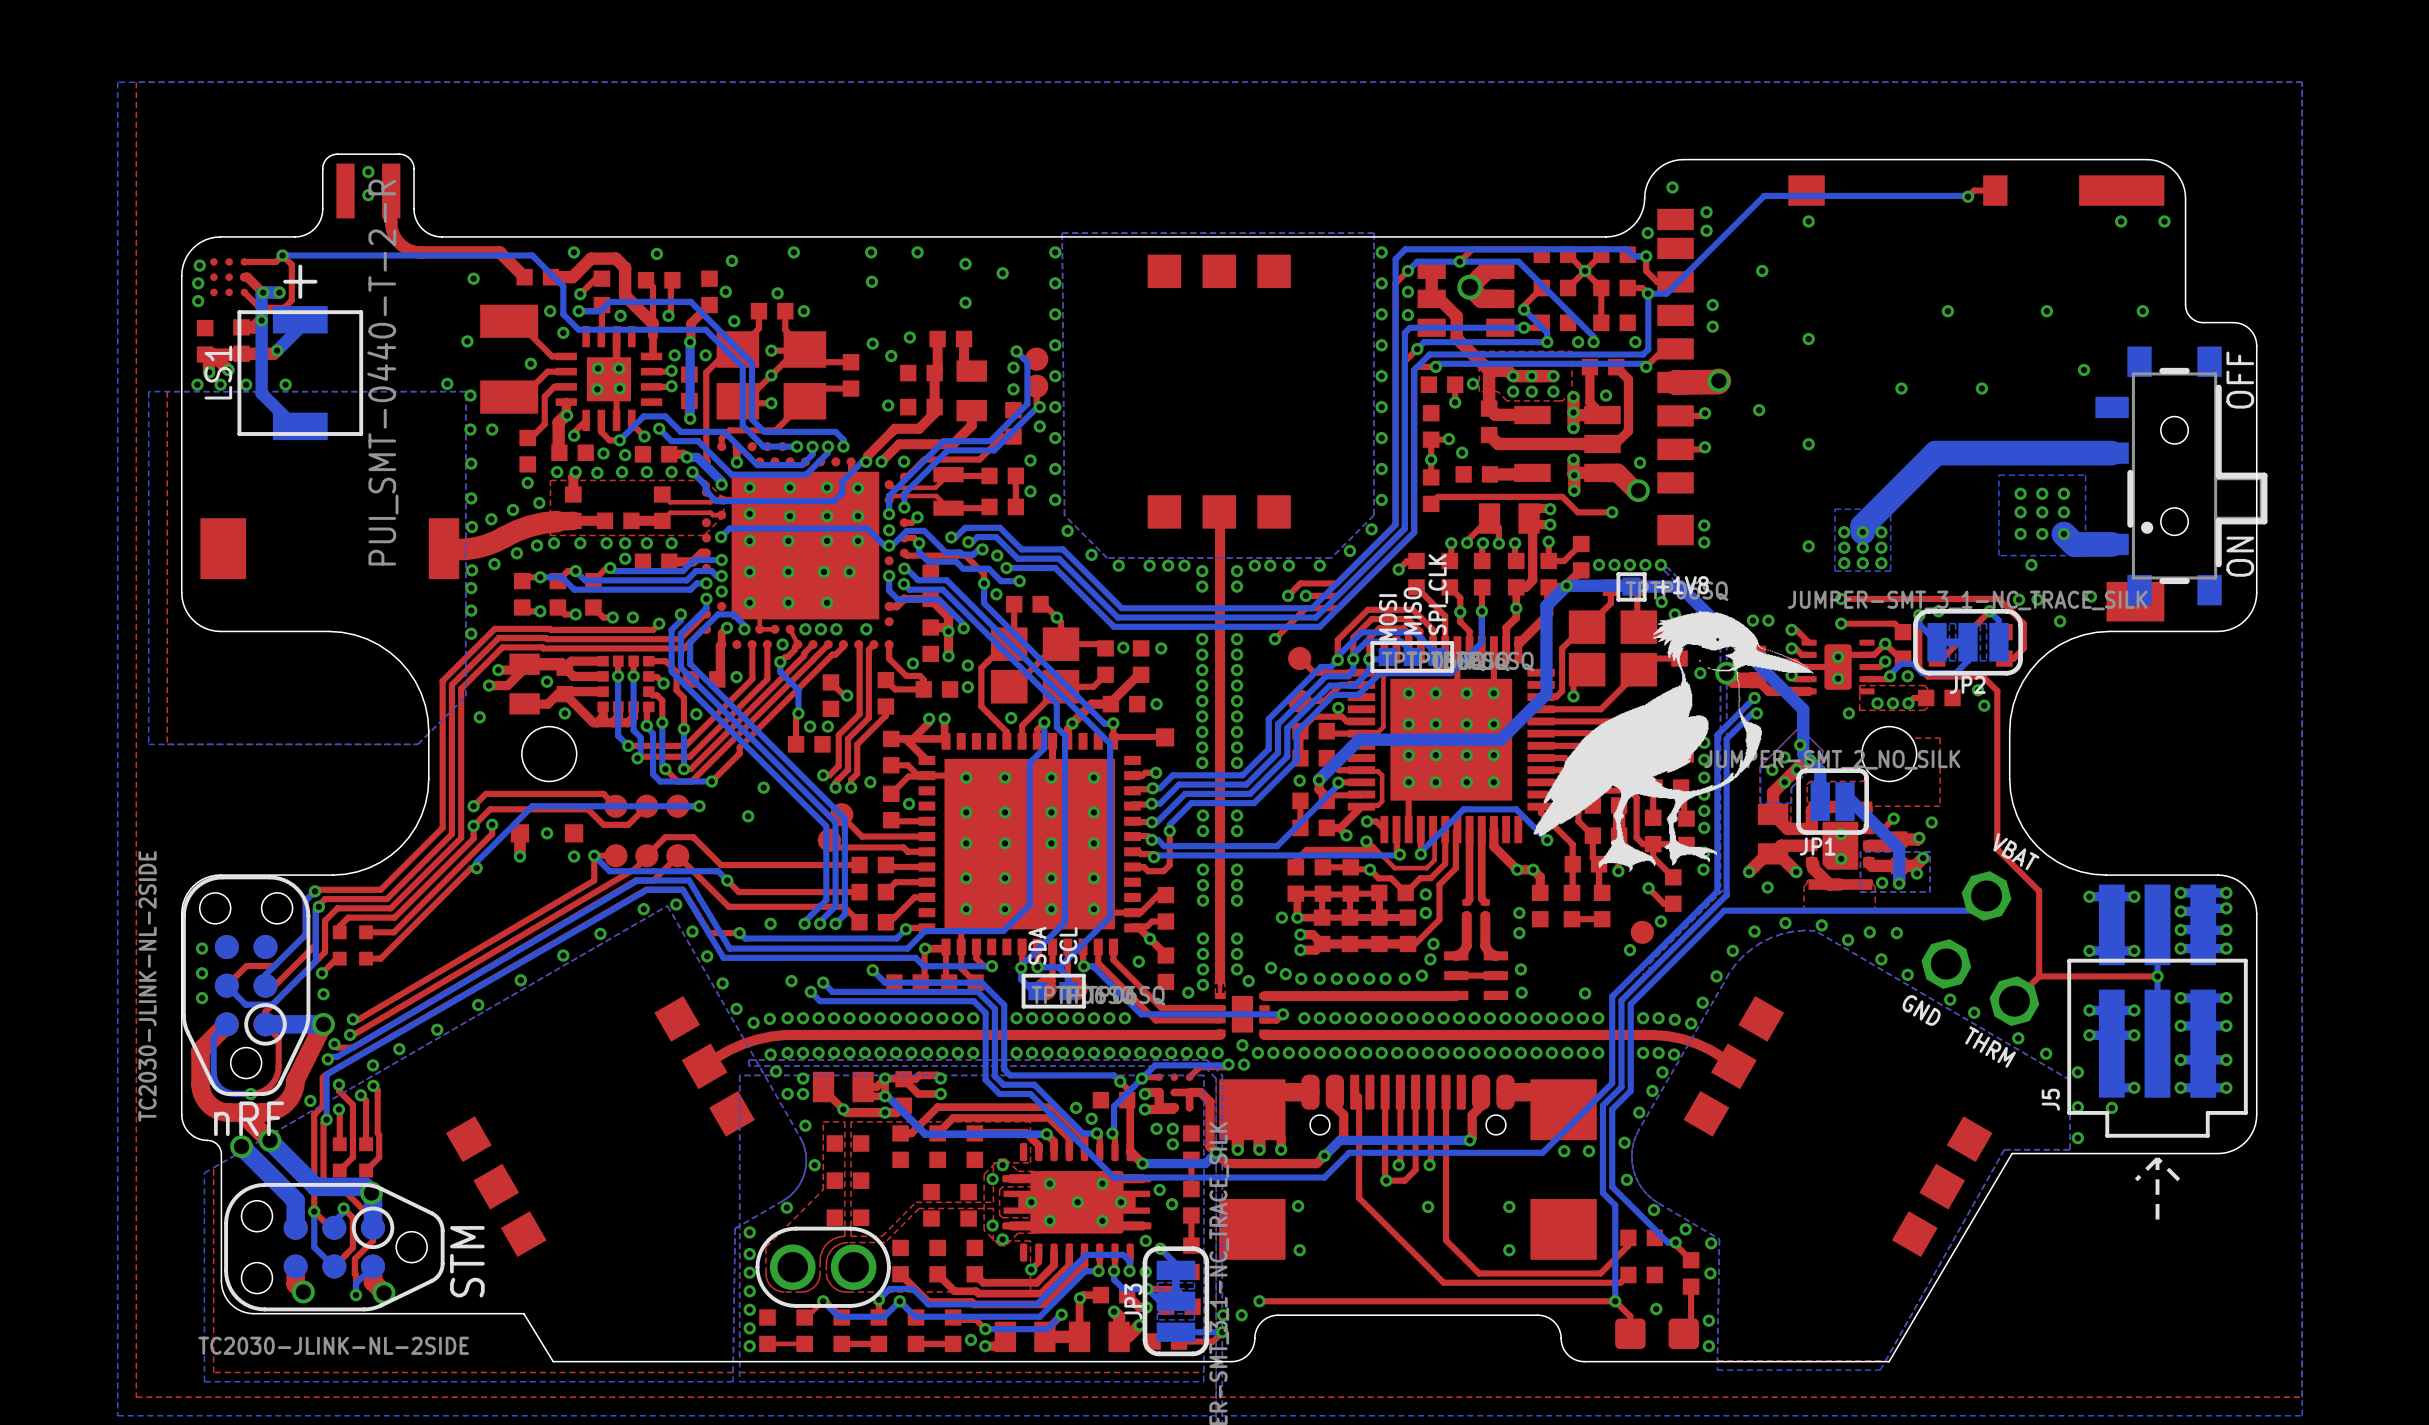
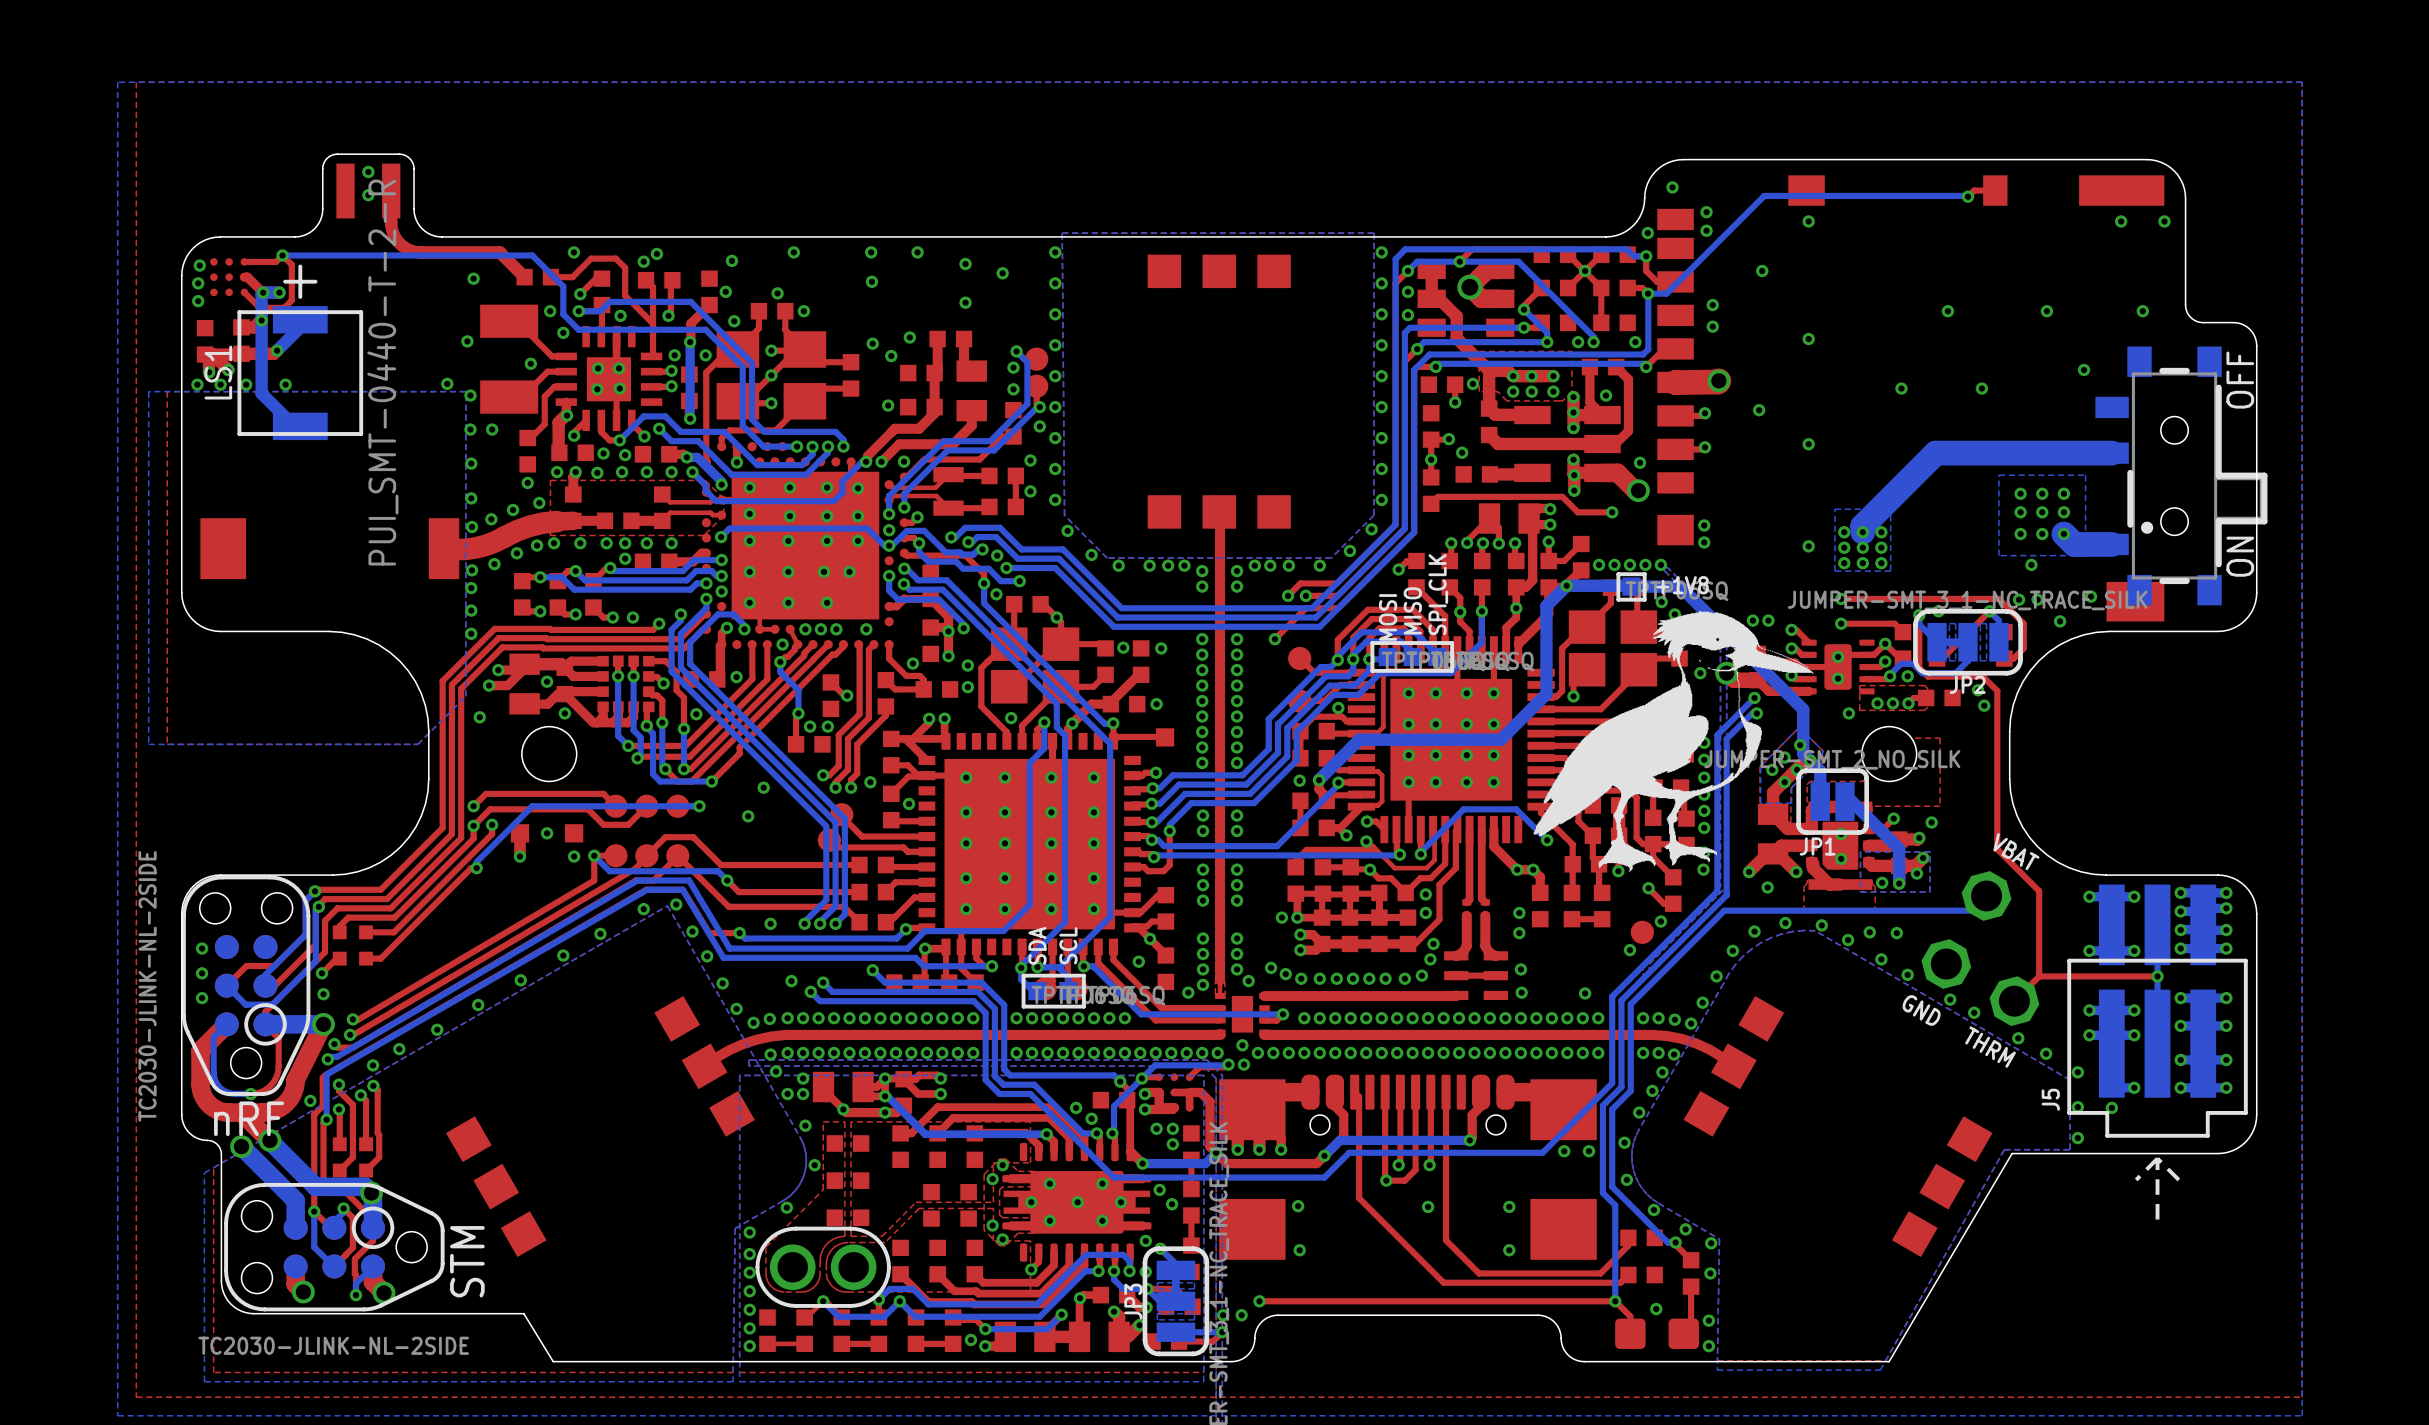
via: none -> (643, 261)
top track width: thick (550, 277) (572, 277) (591, 258) (615, 258) (625, 267) (625, 295) (653, 323) (653, 354) -> thin (550, 277) (572, 277) (591, 258) (615, 258) (625, 267) (625, 295) (653, 323) (653, 354)

